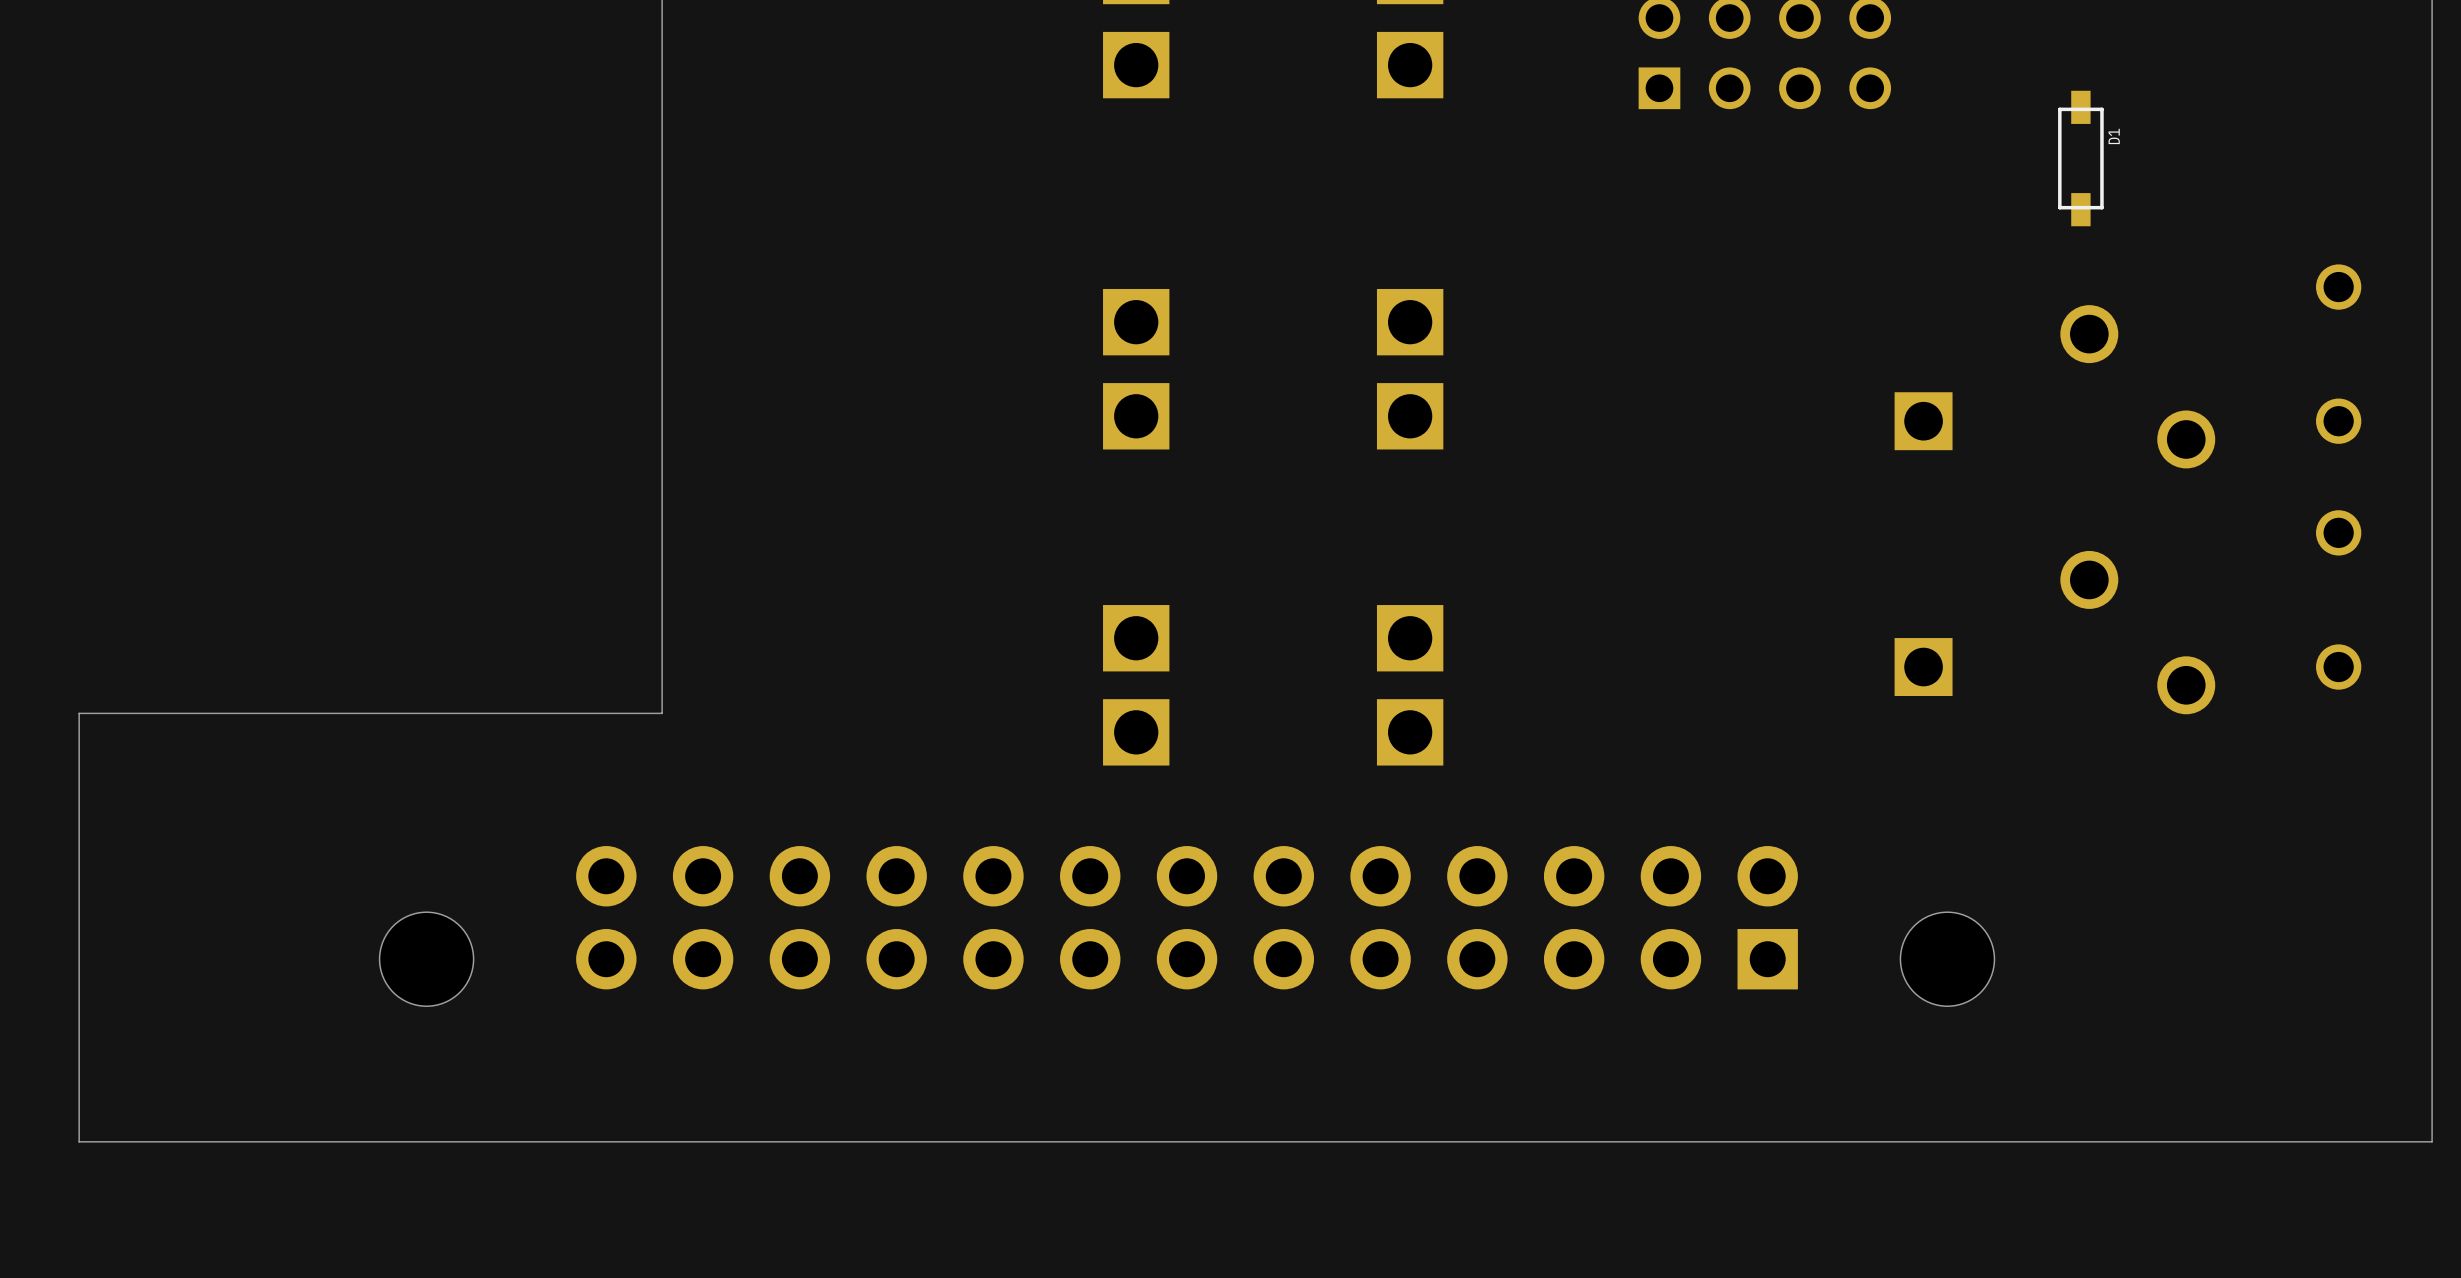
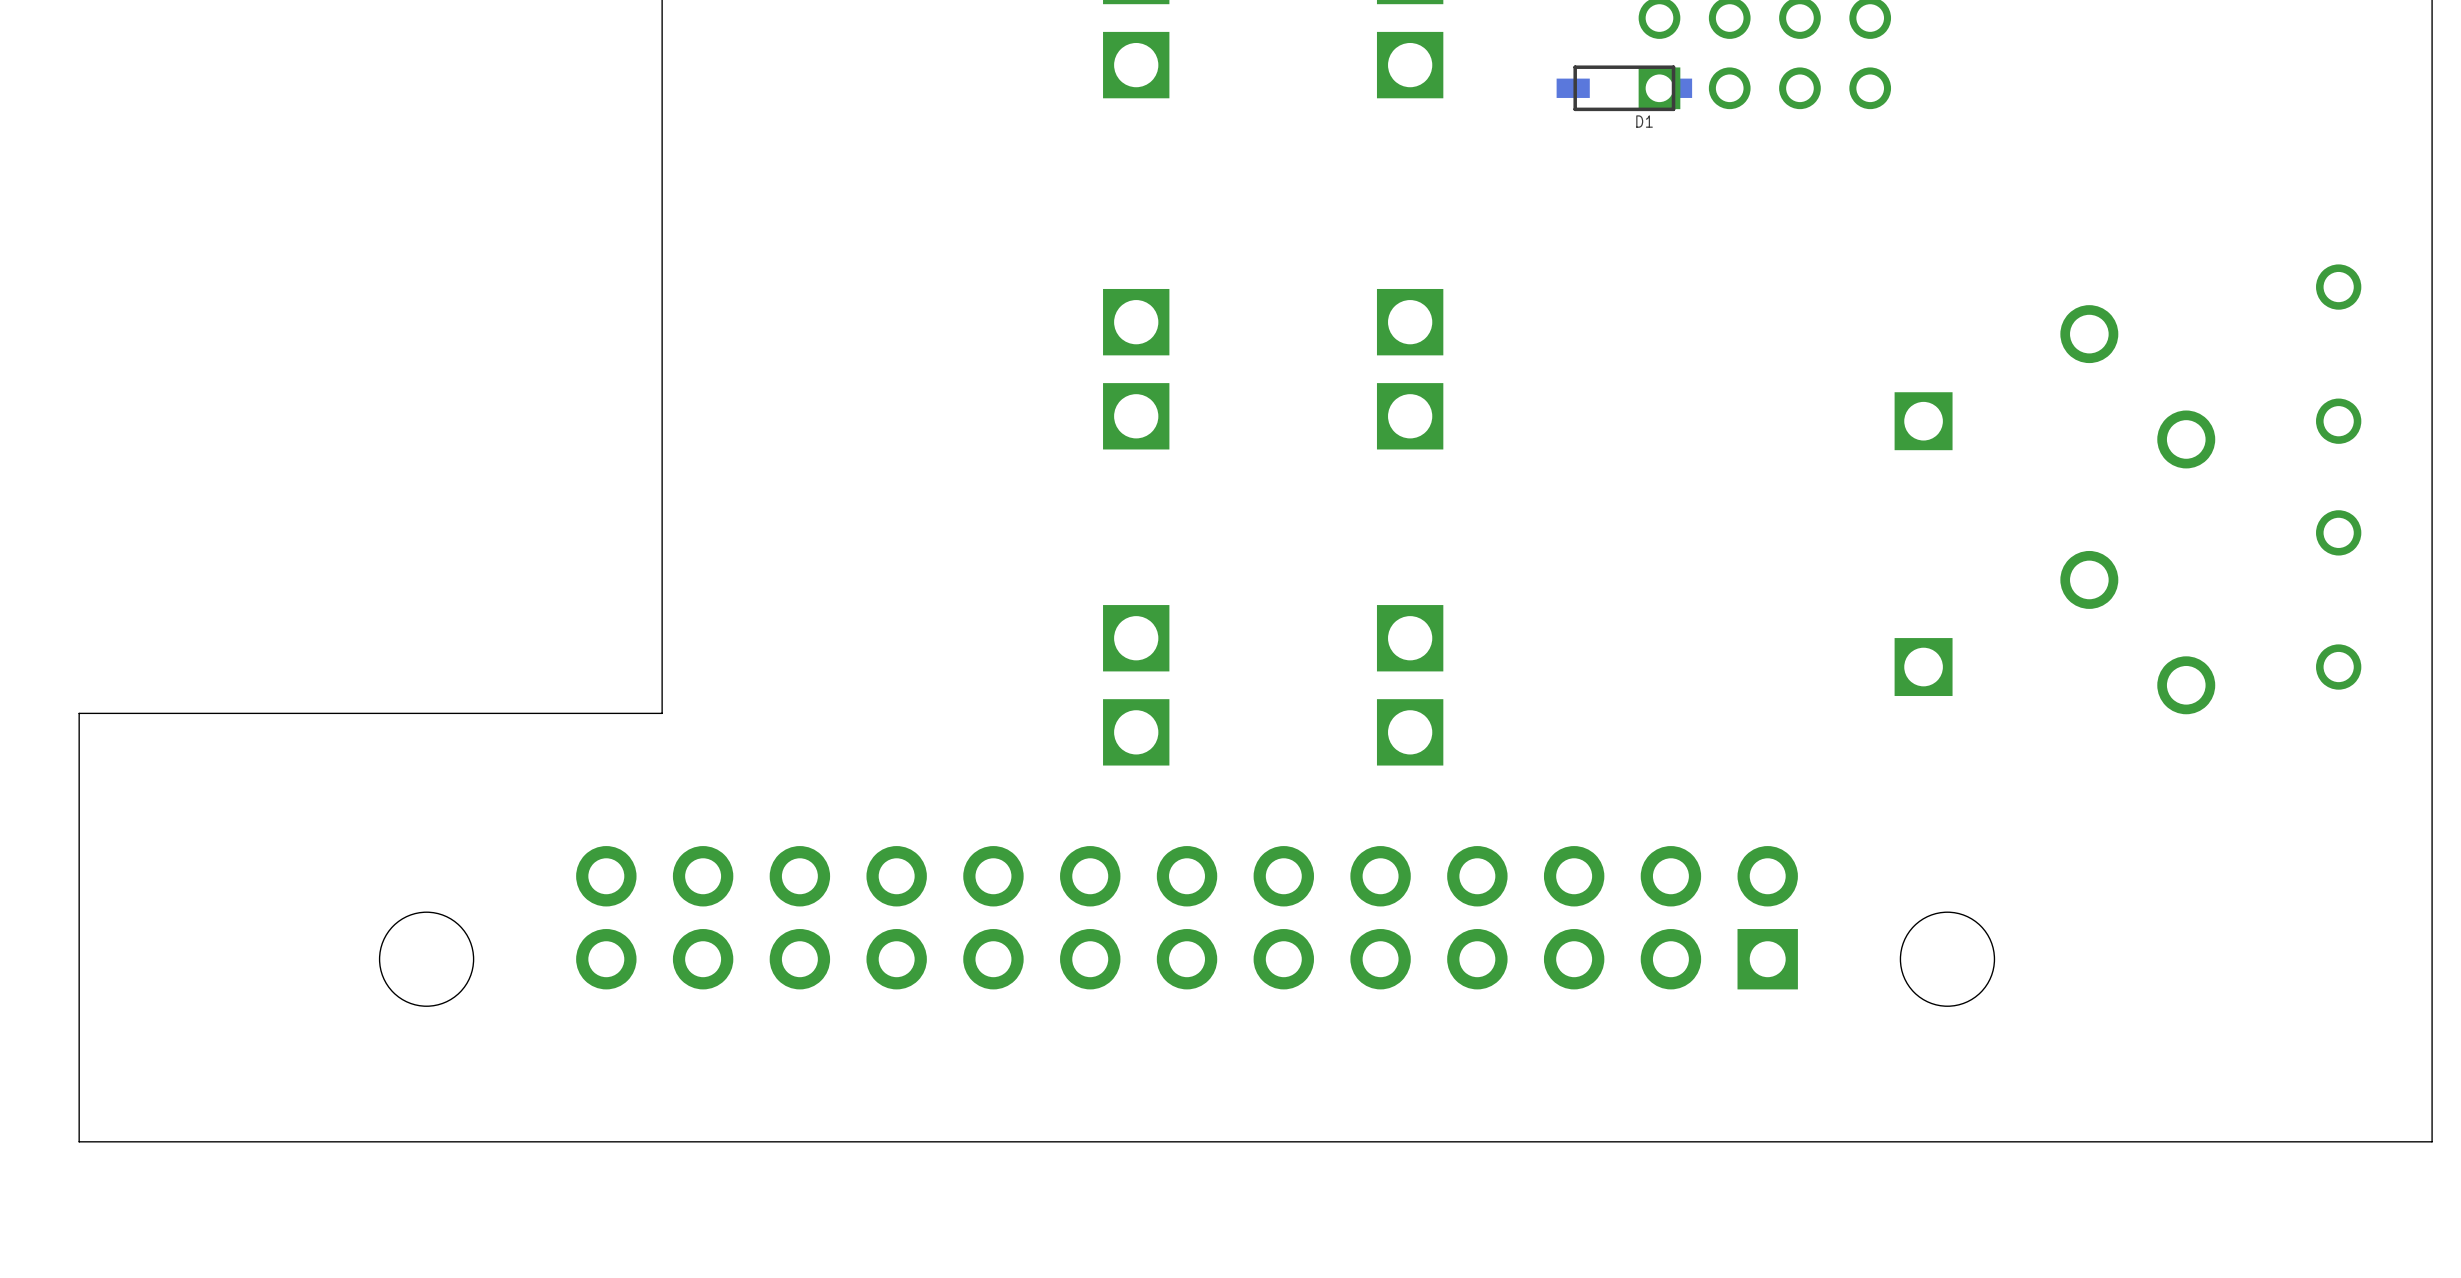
D1 rotation: 0° (2080, 158) -> 90° clockwise (1624, 88)
D1 position: (2080, 158) -> (1624, 88)

